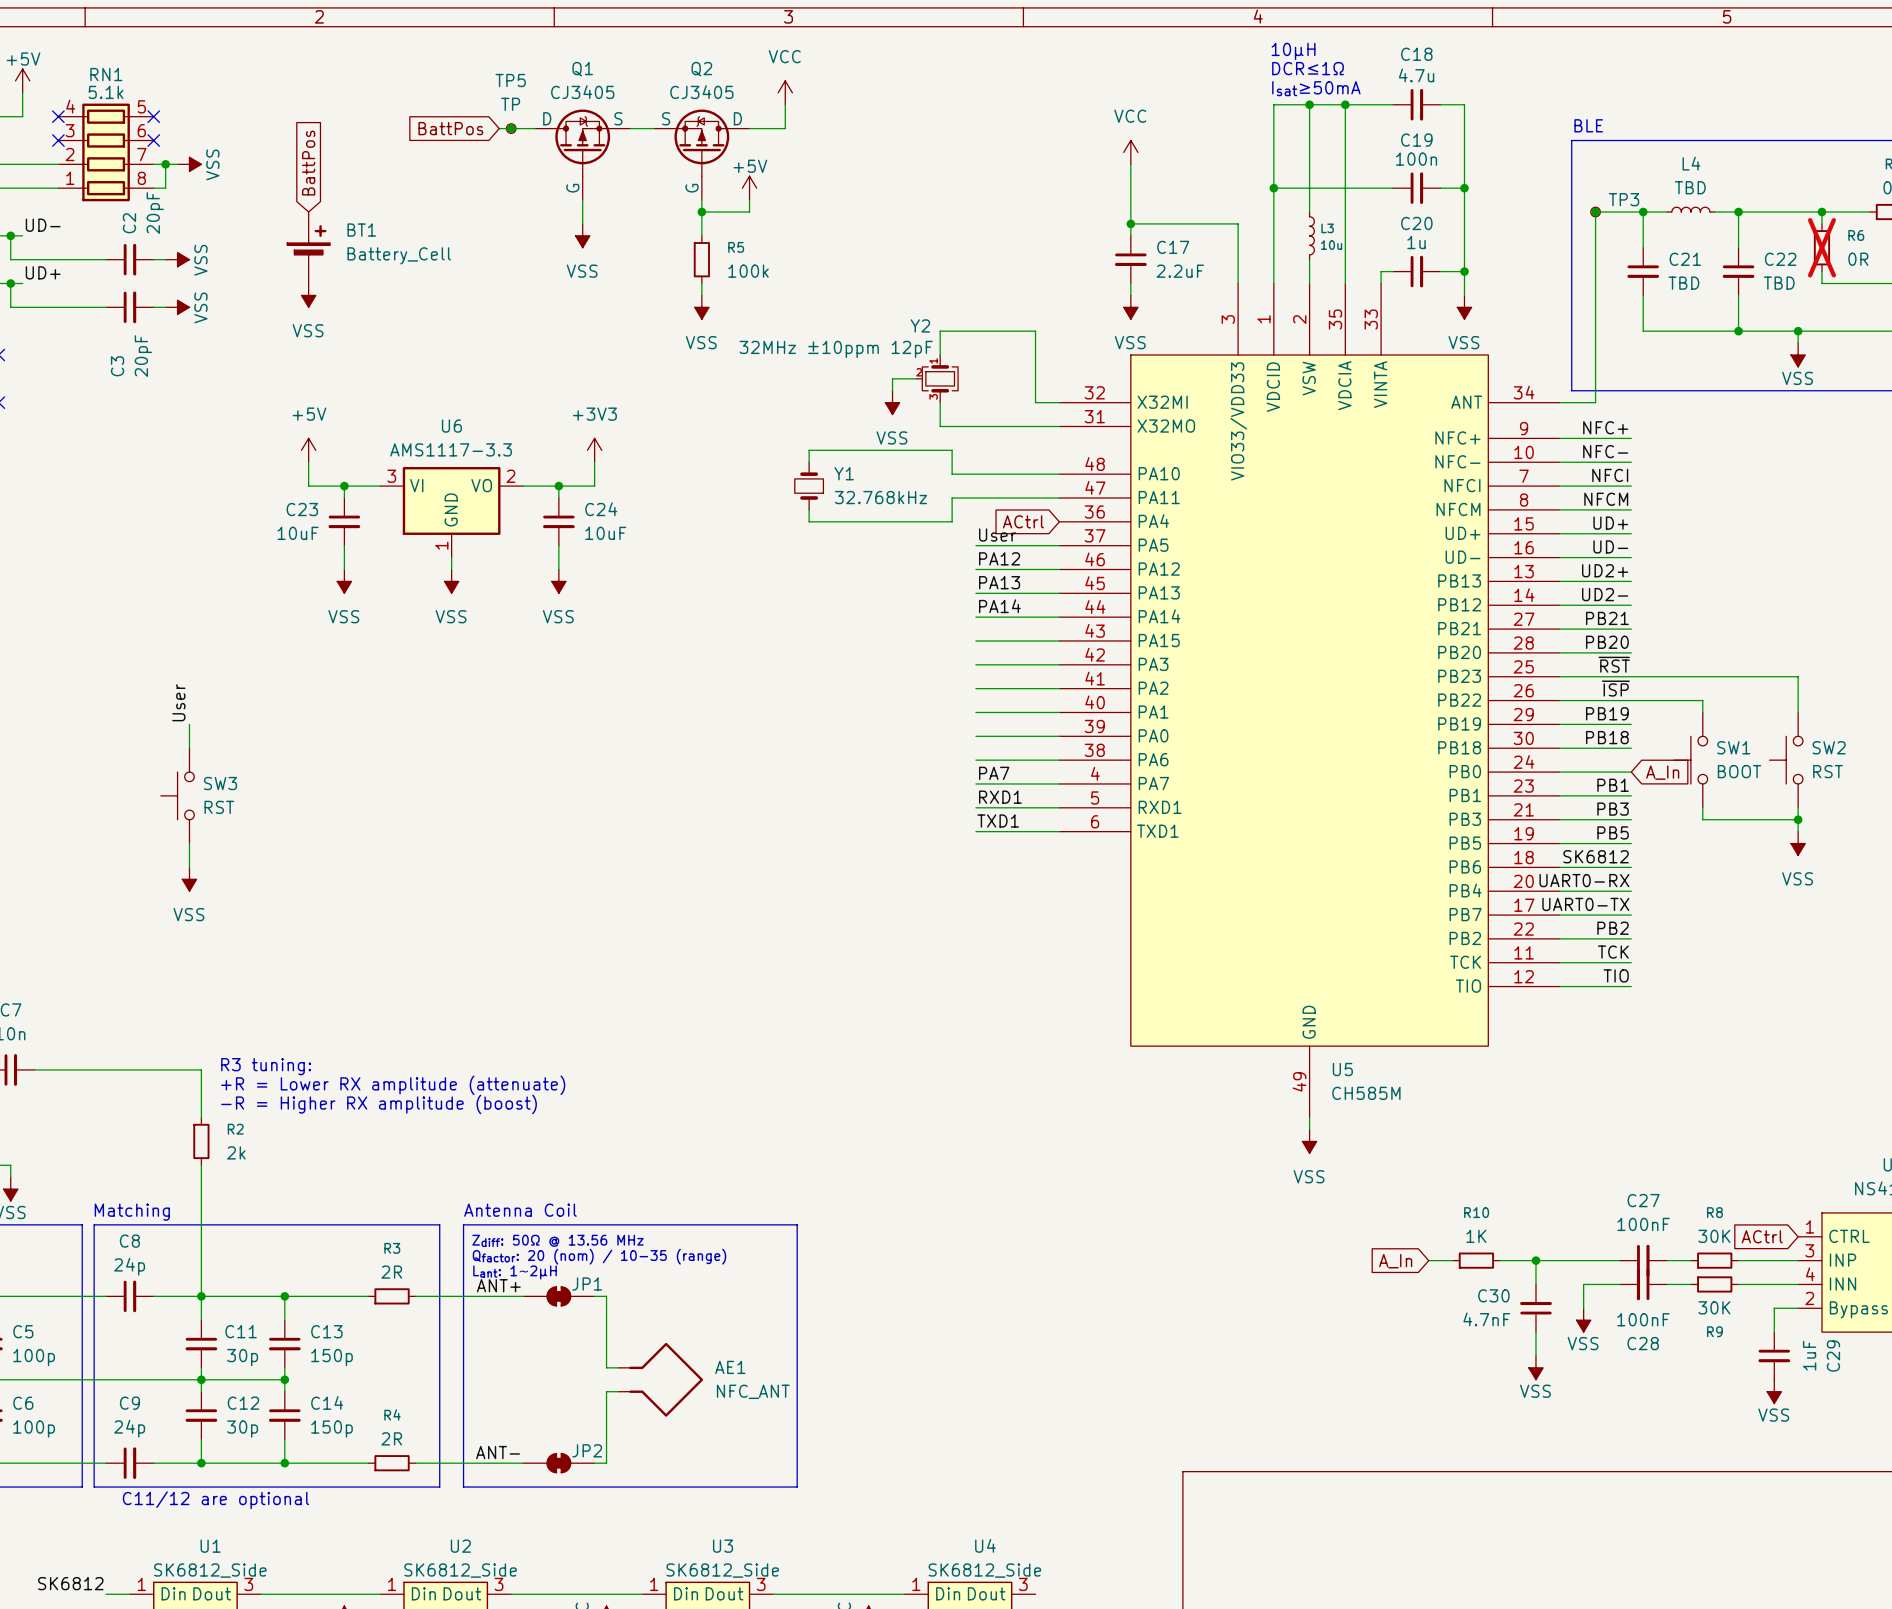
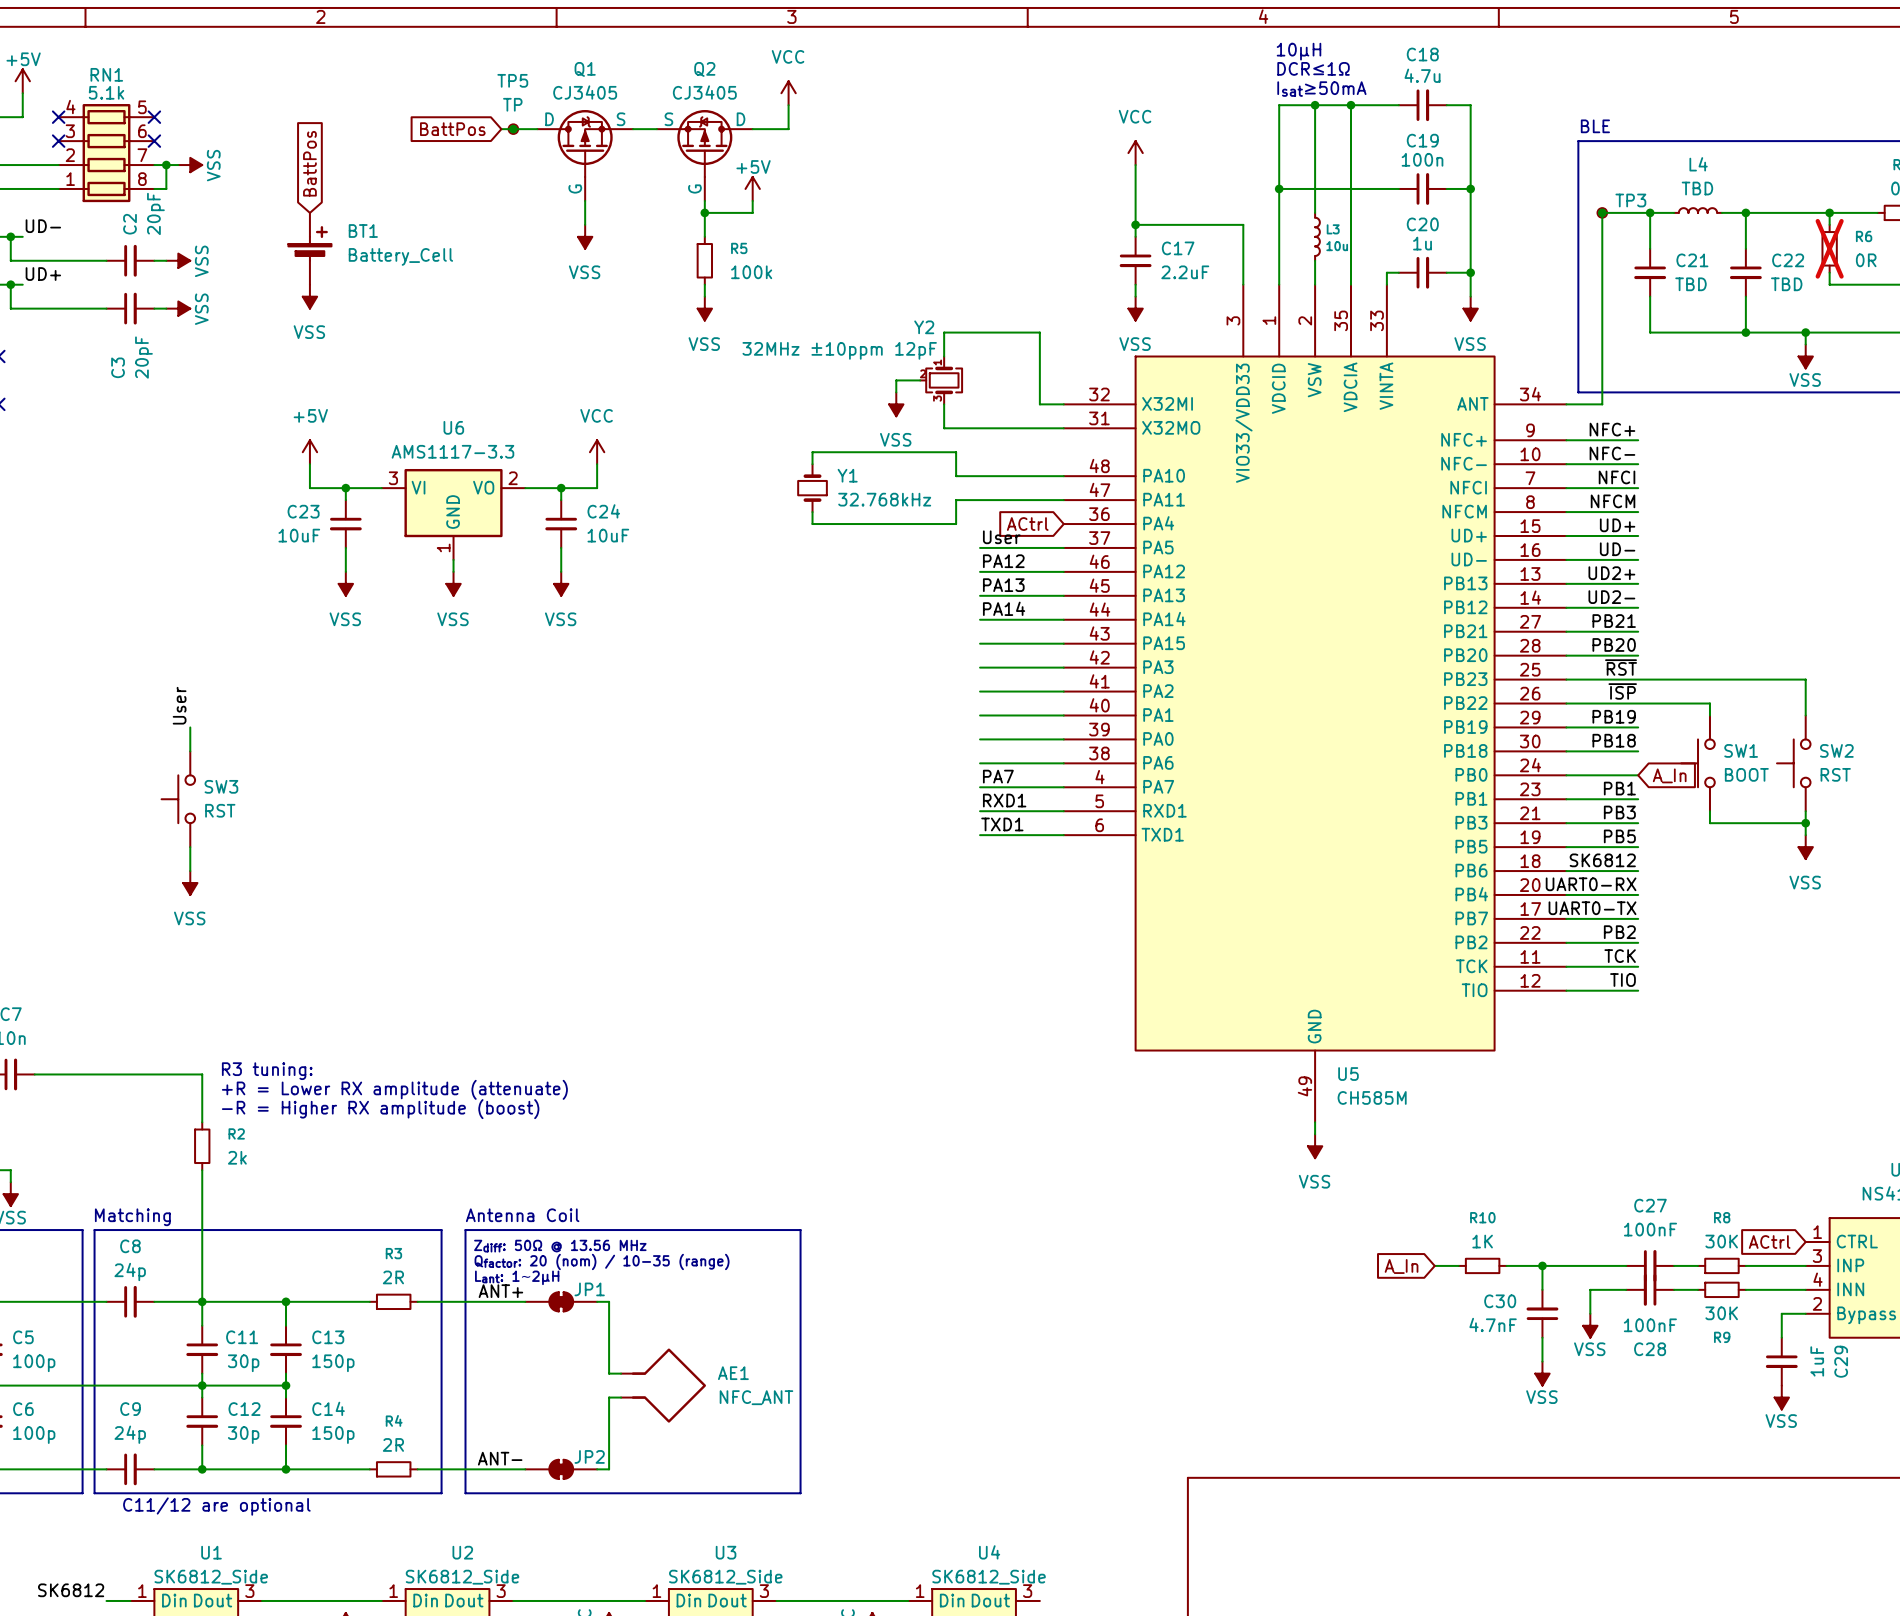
power symbol: +3V3 (594, 450) -> VCC (597, 452)

